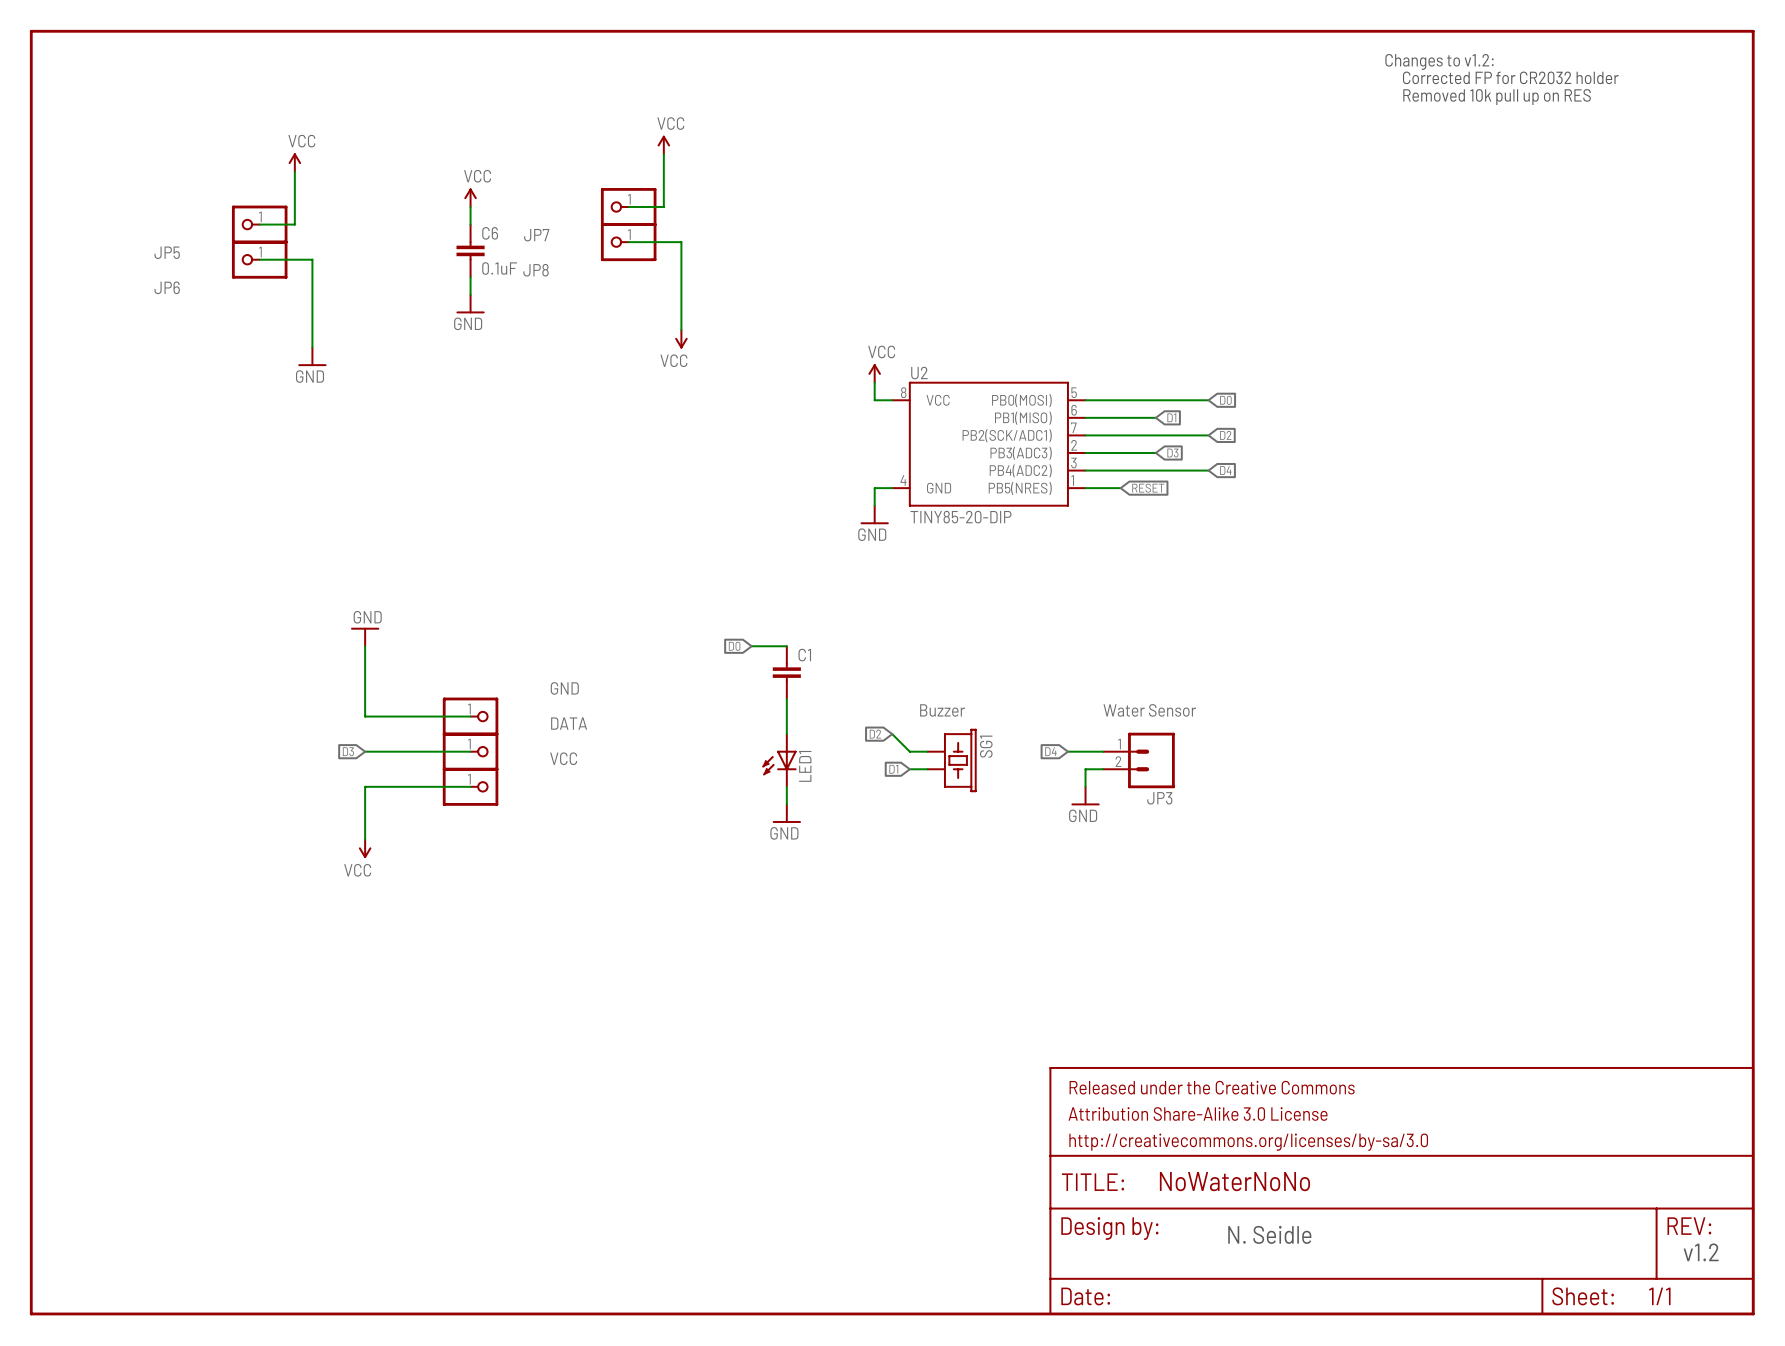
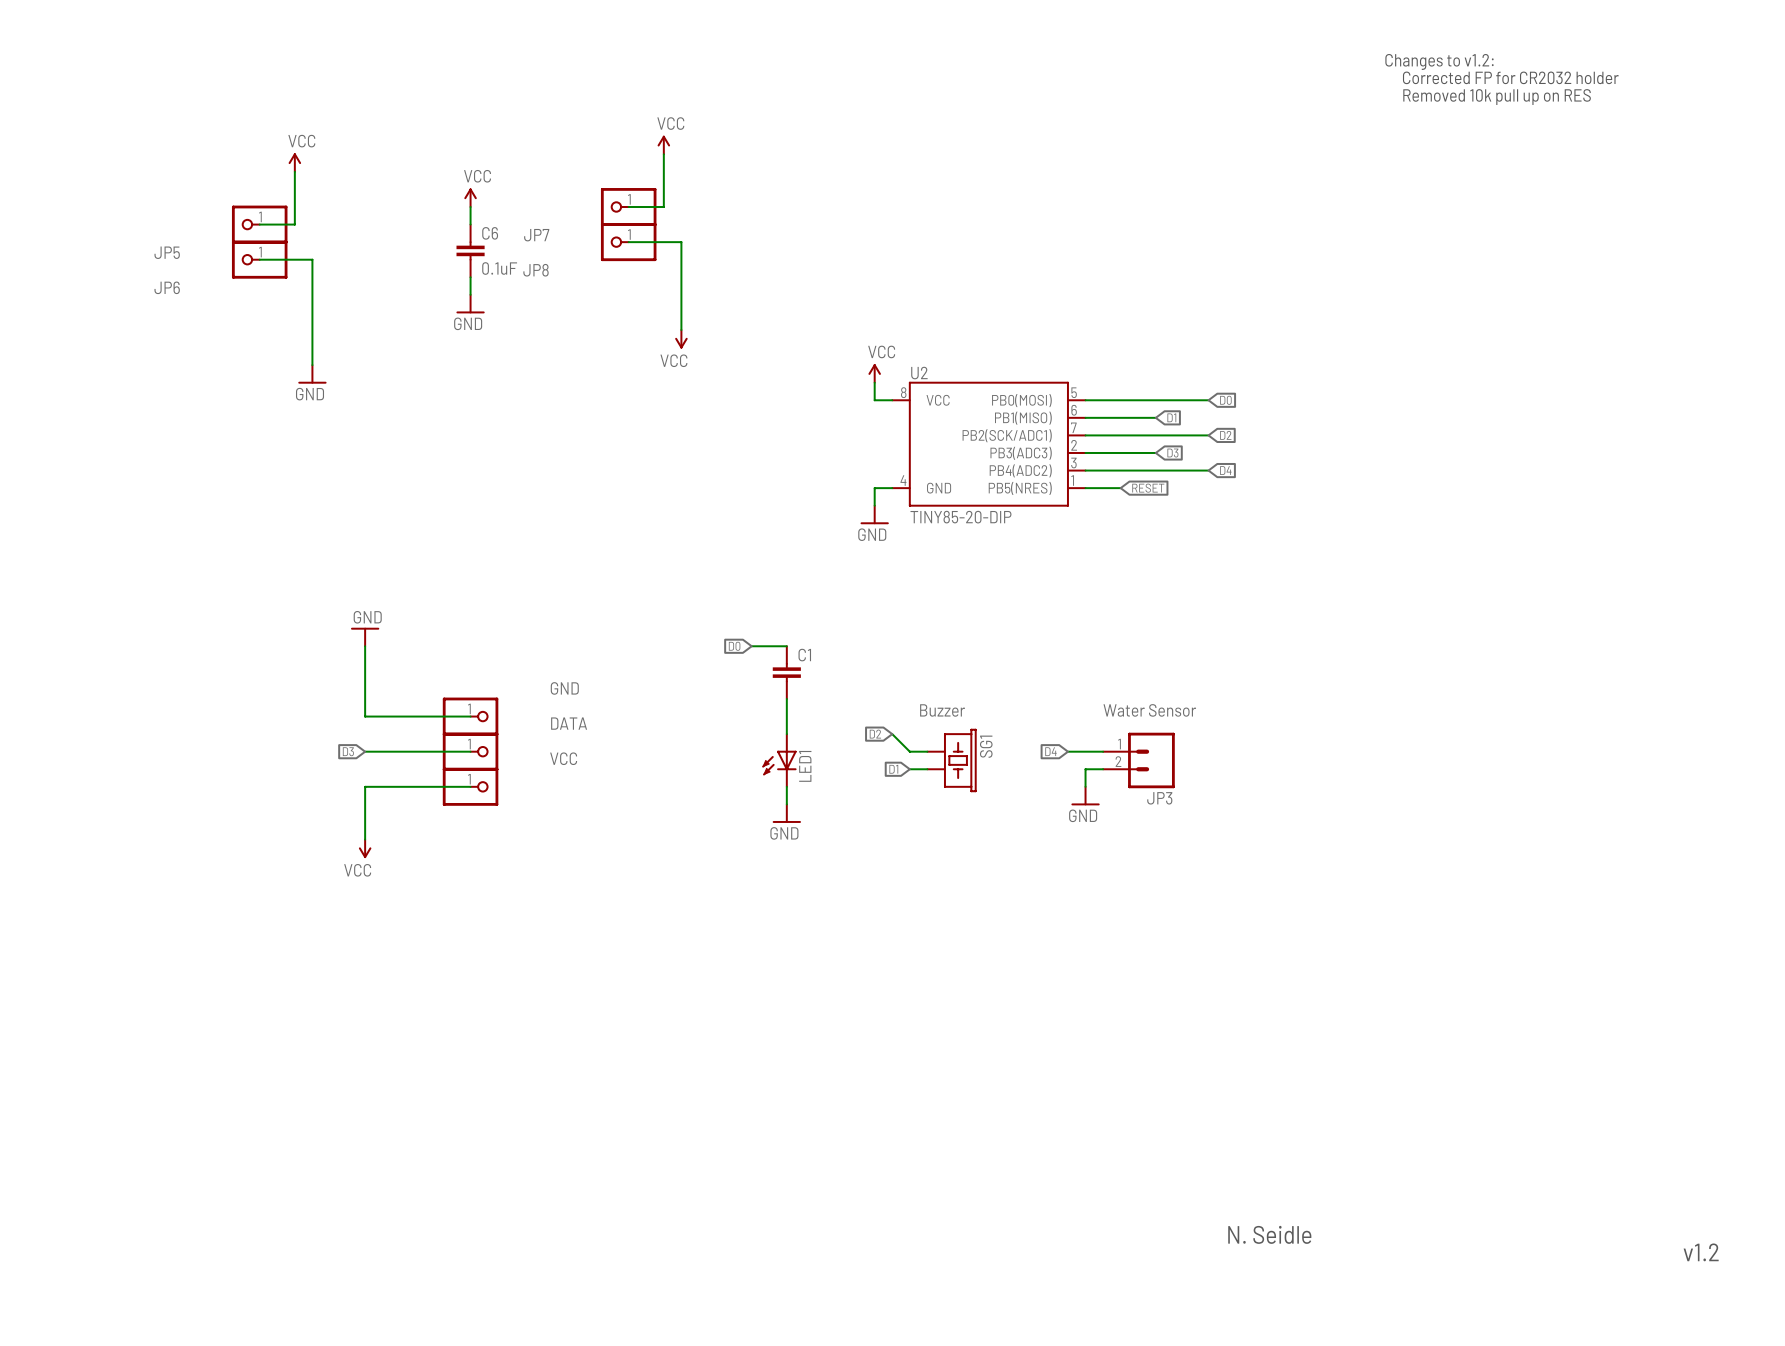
power symbol position: GND (312, 356) -> GND (312, 374)
part: (892, 672) -> none
part: (1401, 1190) -> none

